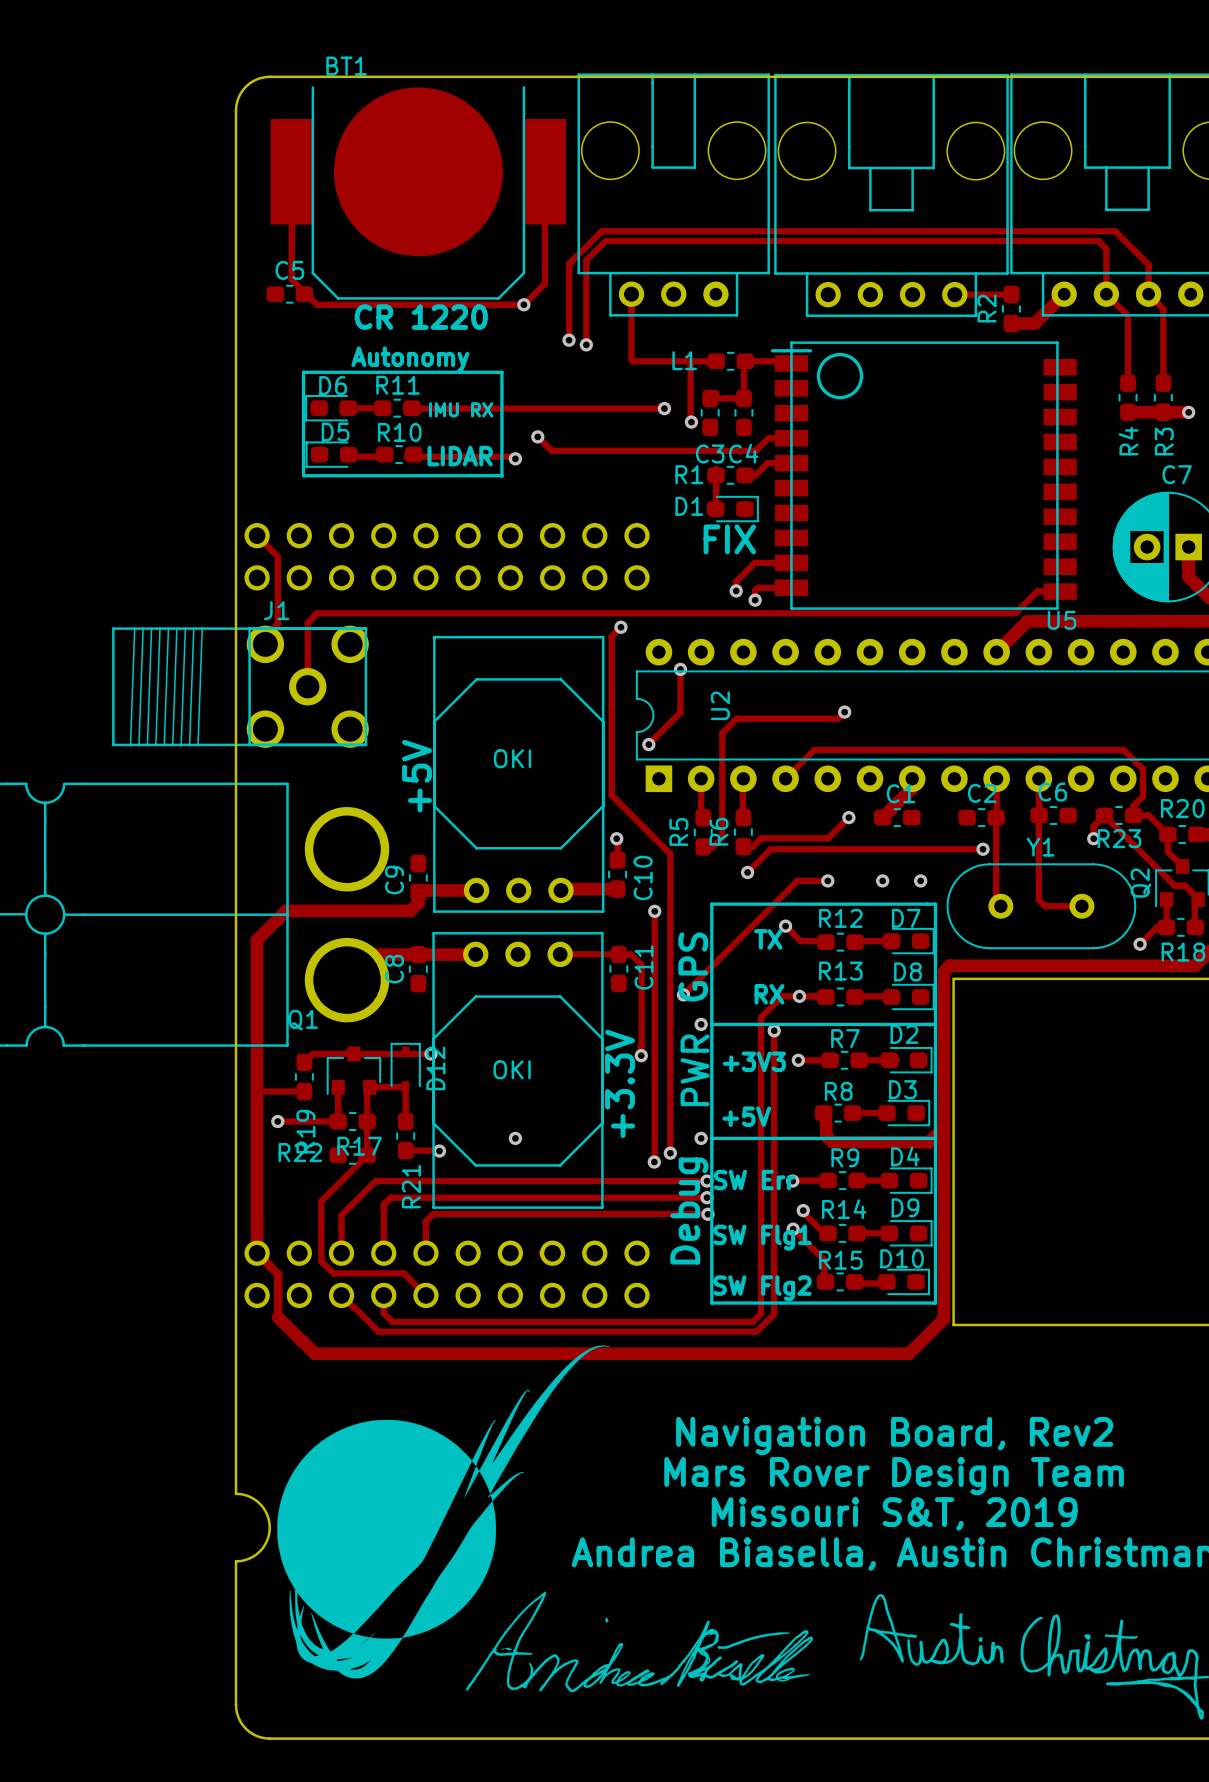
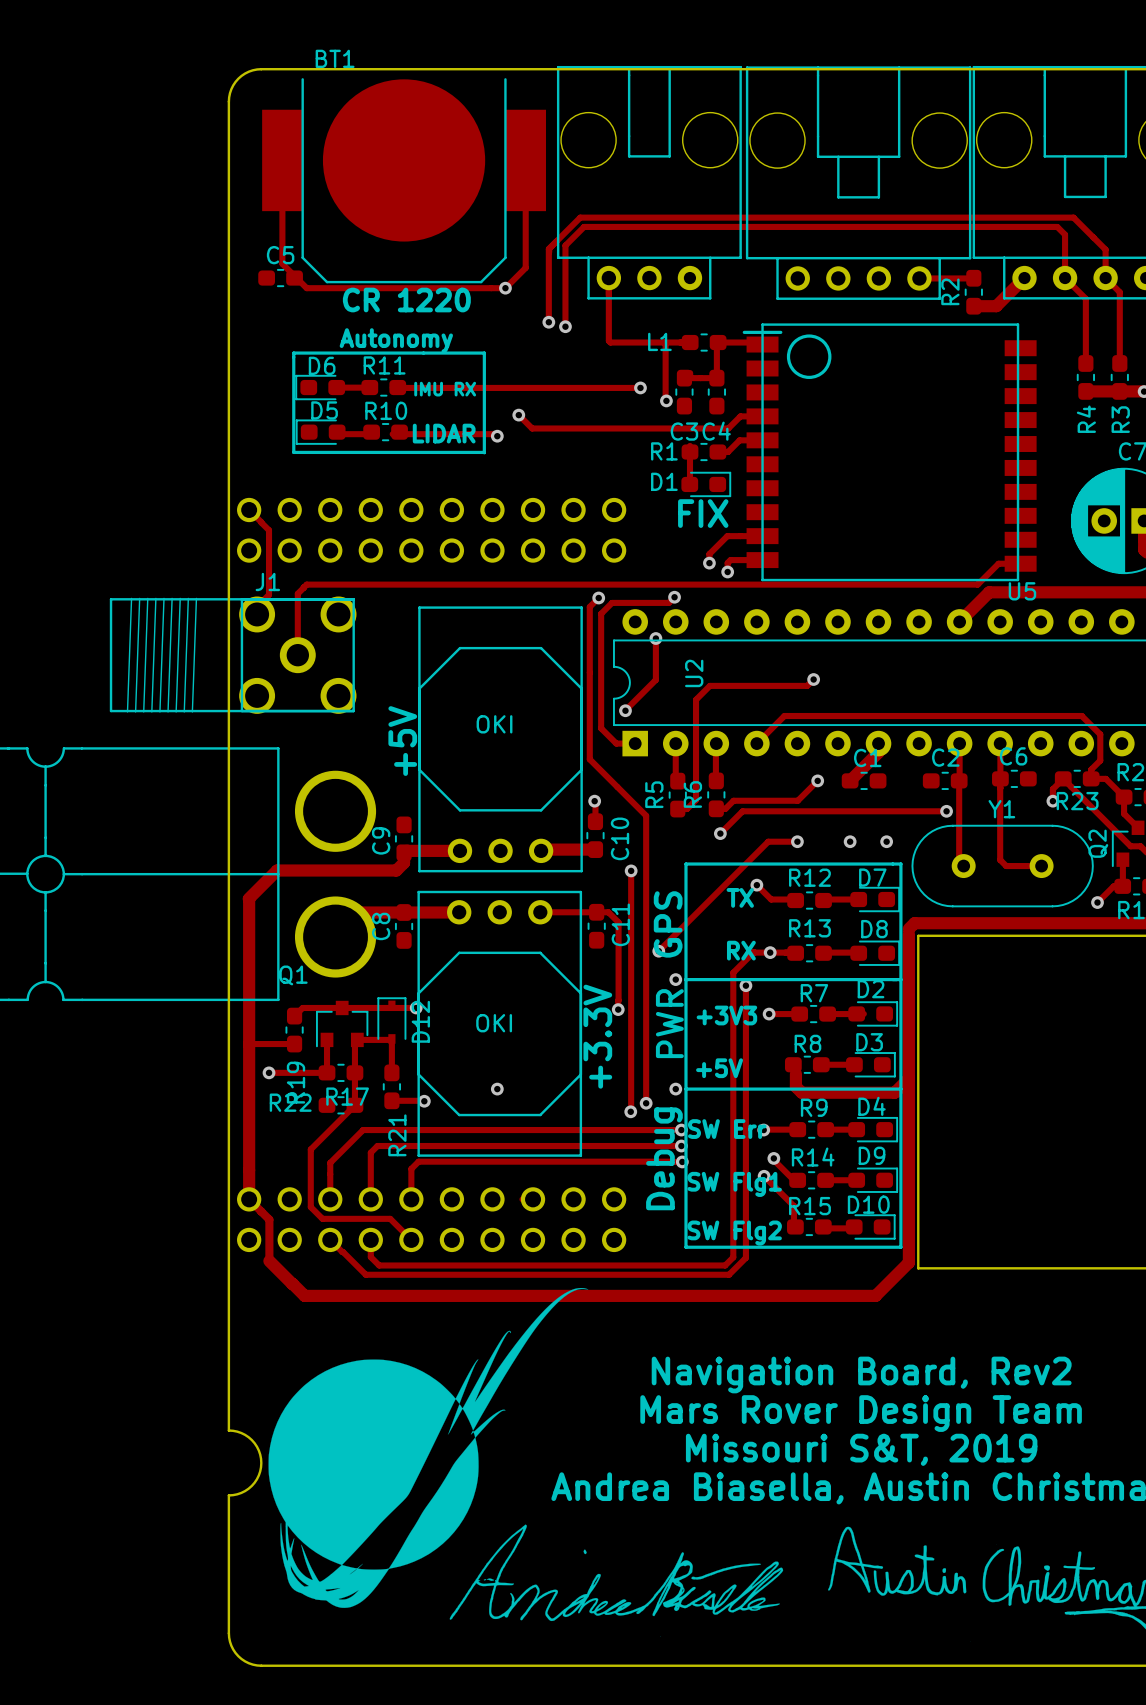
track: none -> (674, 597) (668, 602) (612, 602) (601, 613) (601, 728) (616, 743) (635, 743)
via: none -> (674, 597)

